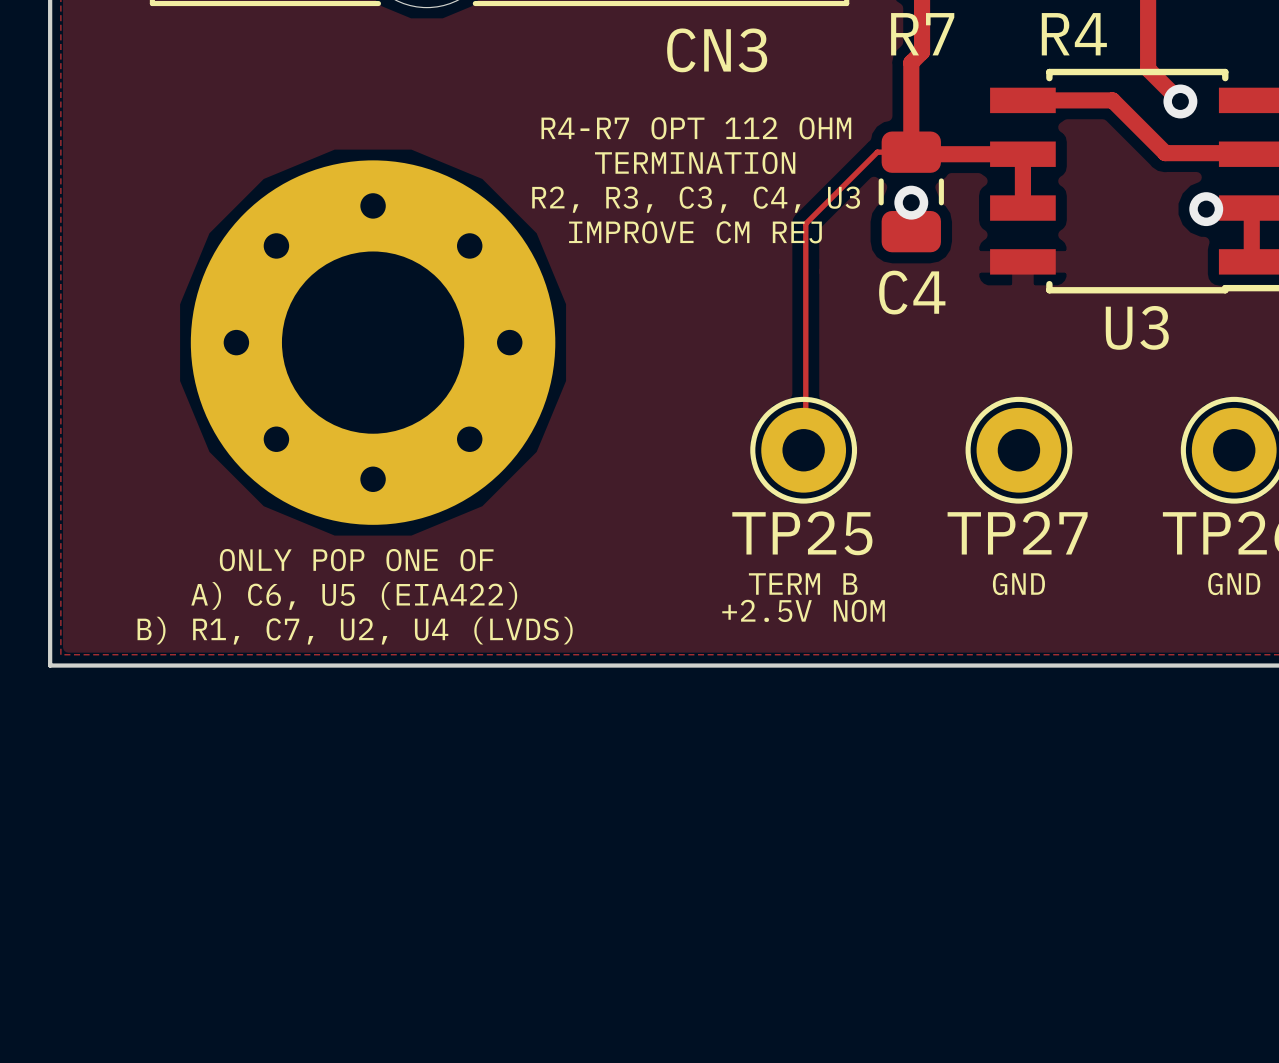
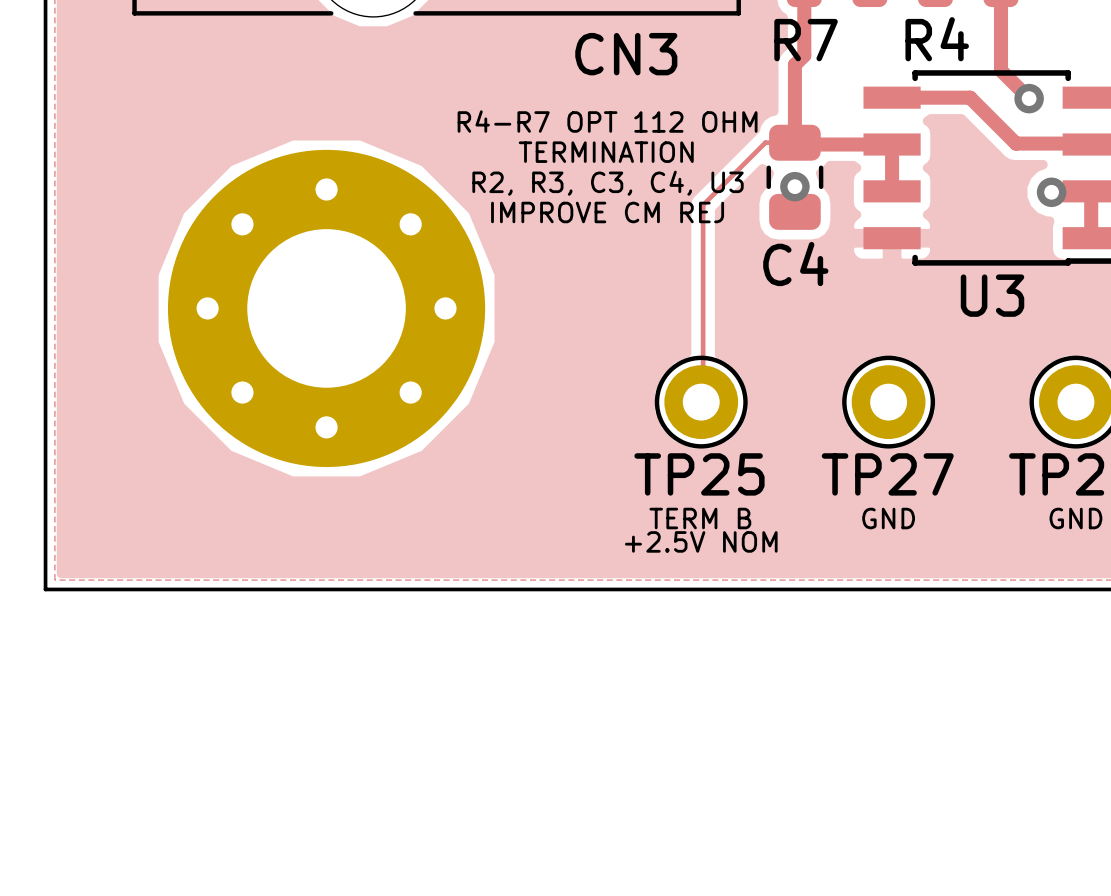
text: ONLY POP ONE OF (356, 560) -> none
text: A) C6, U5 (EIA422) (354, 595) -> none
text: B) R1, C7, U2, U4 (LVDS) (355, 630) -> none

